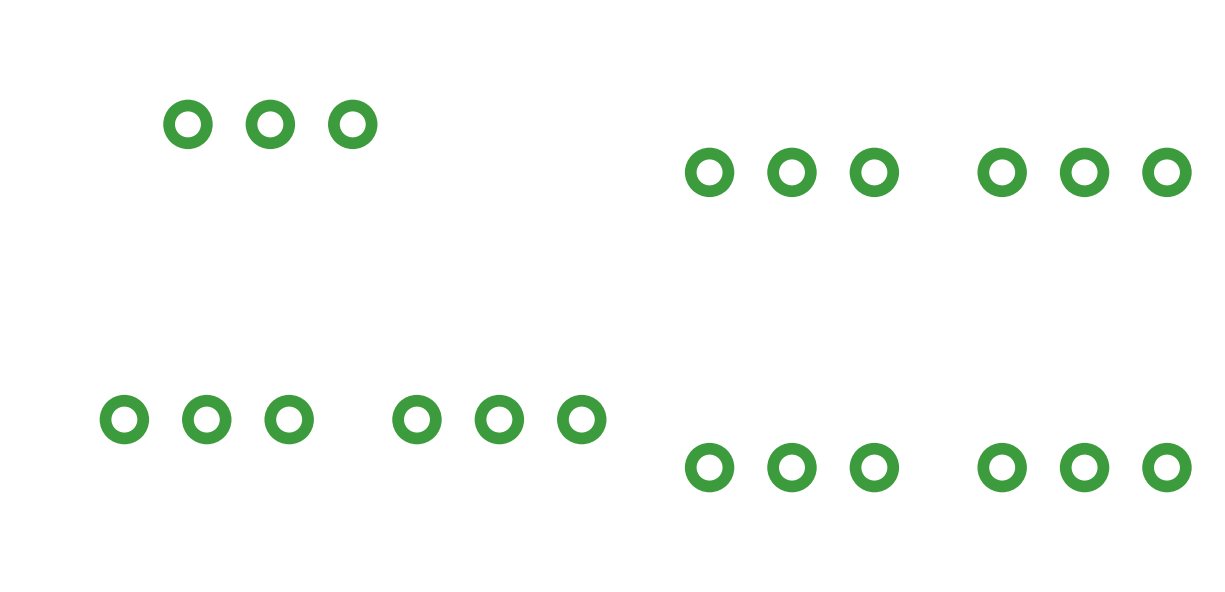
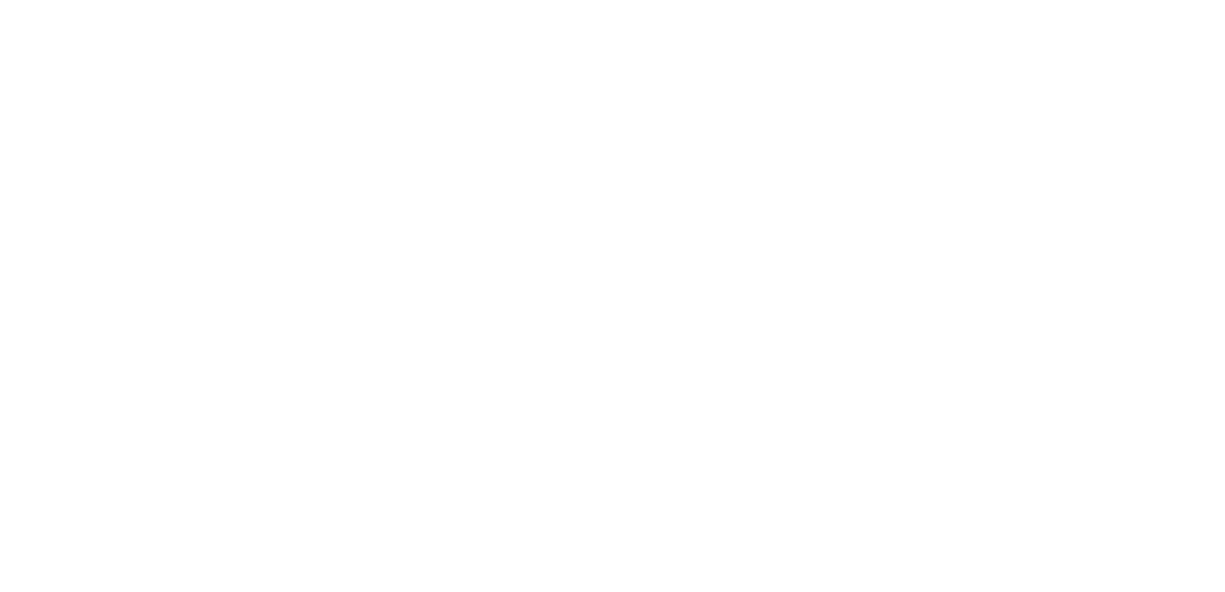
part: (270, 124) -> none
part: (791, 172) -> none
part: (1084, 172) -> none
part: (206, 419) -> none
part: (499, 419) -> none
part: (791, 467) -> none
part: (1084, 467) -> none

